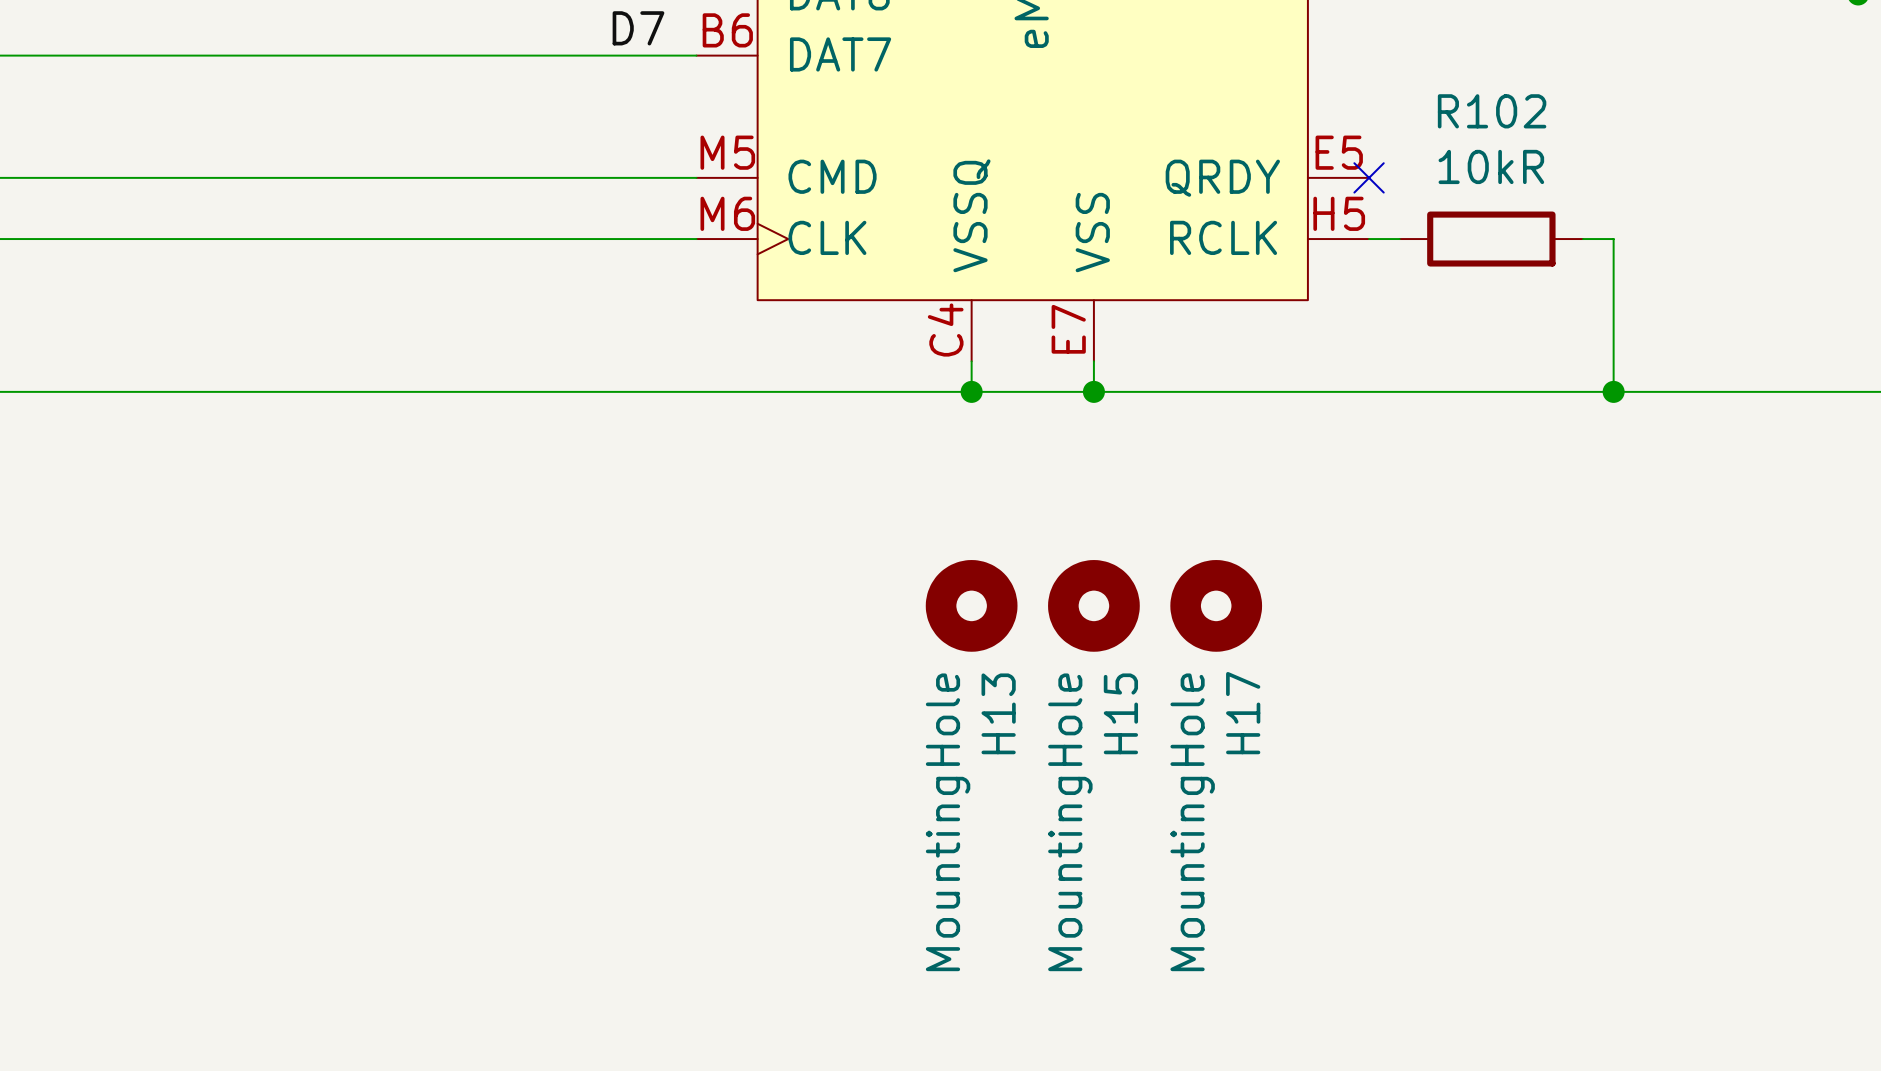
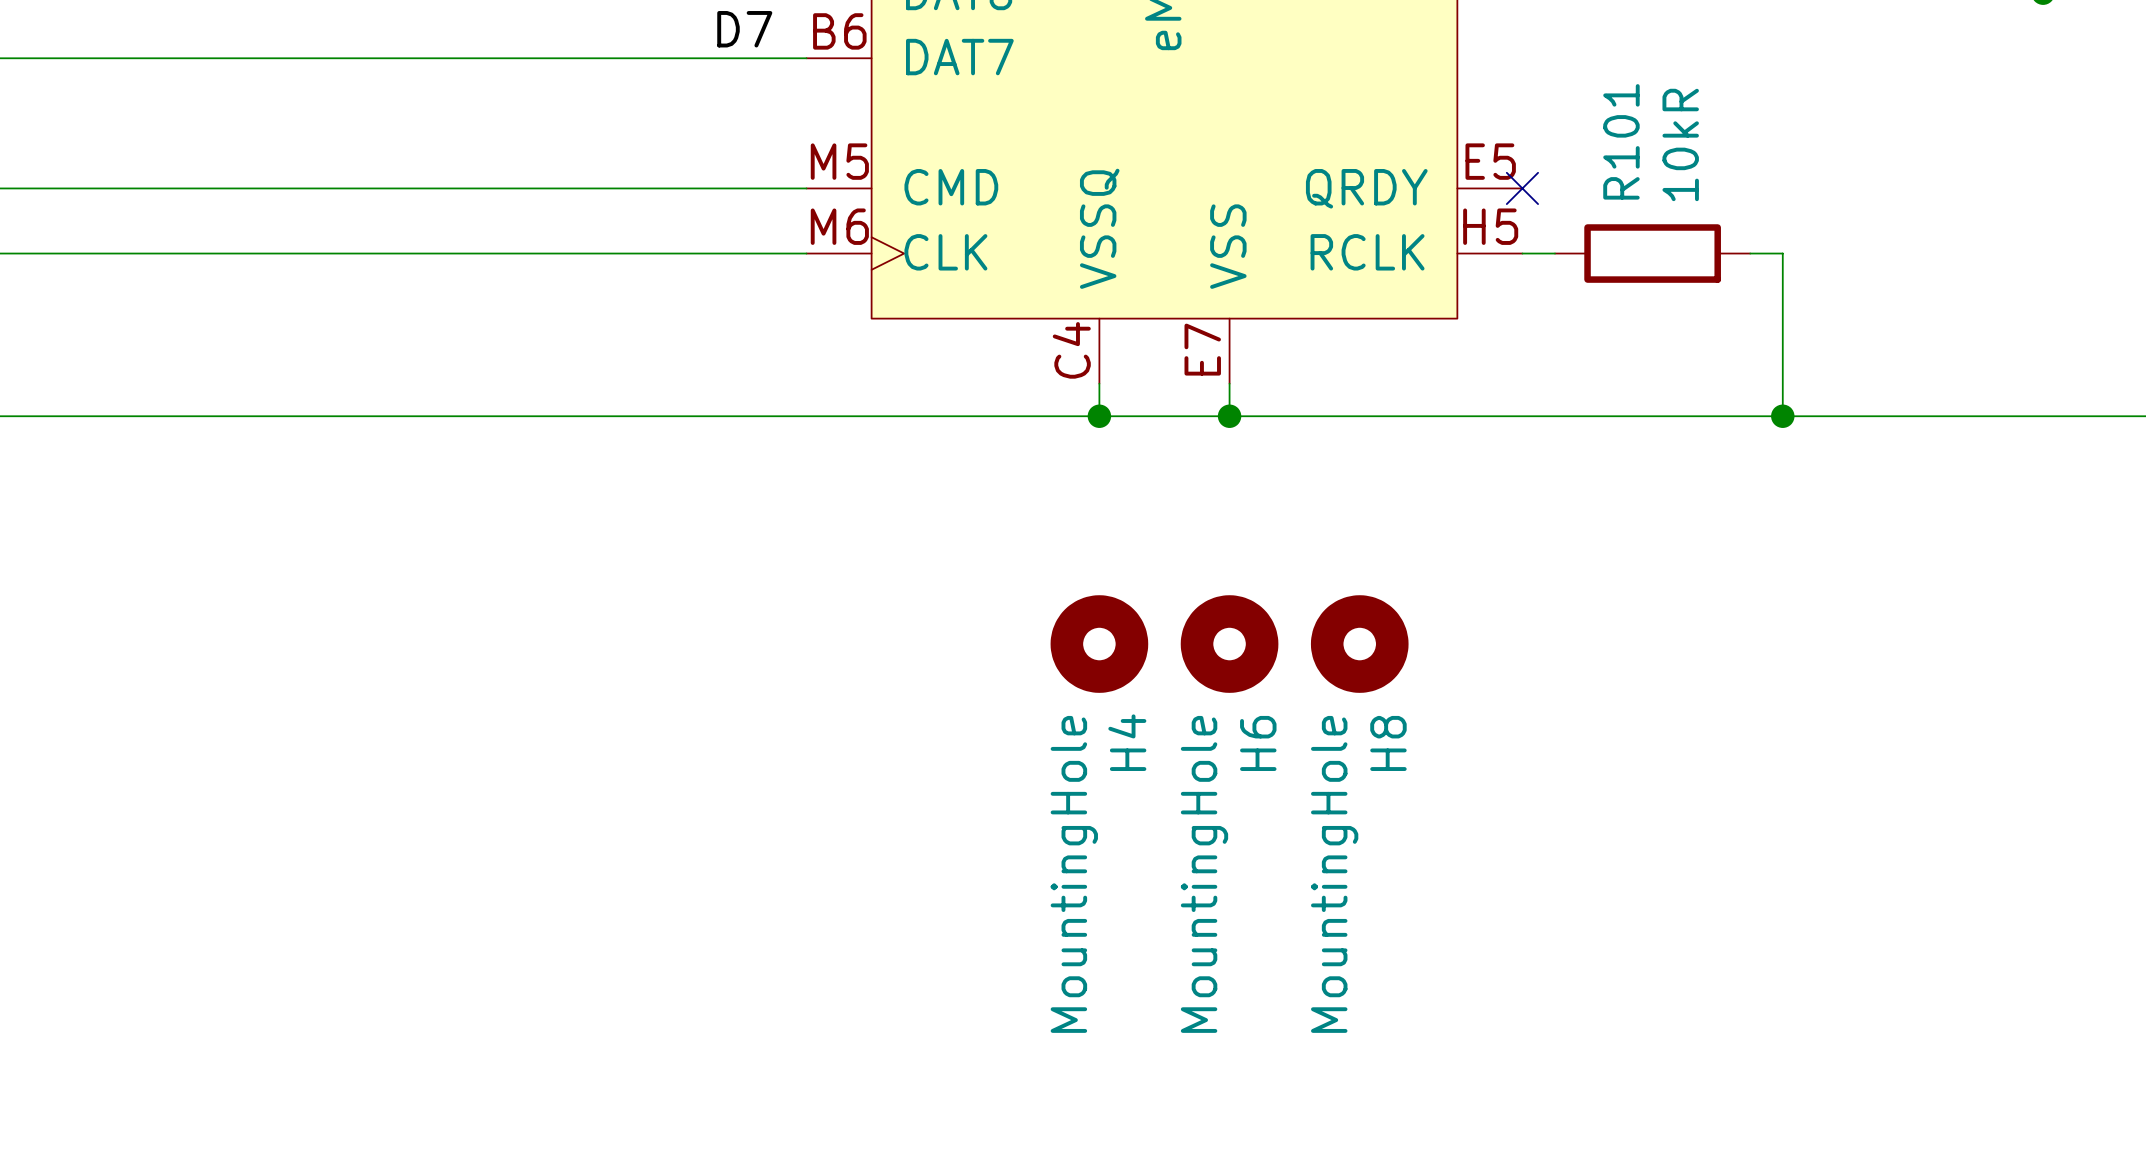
R102 name: R102 (1492, 111) -> R101 (1621, 141)
R102 value rotation: 0° (1491, 166) -> 90° counterclockwise (1680, 144)
H13 name: H13 (998, 713) -> H4 (1127, 742)
H15 name: H15 (1120, 713) -> H6 (1258, 743)
H17 name: H17 (1243, 713) -> H8 (1388, 743)

